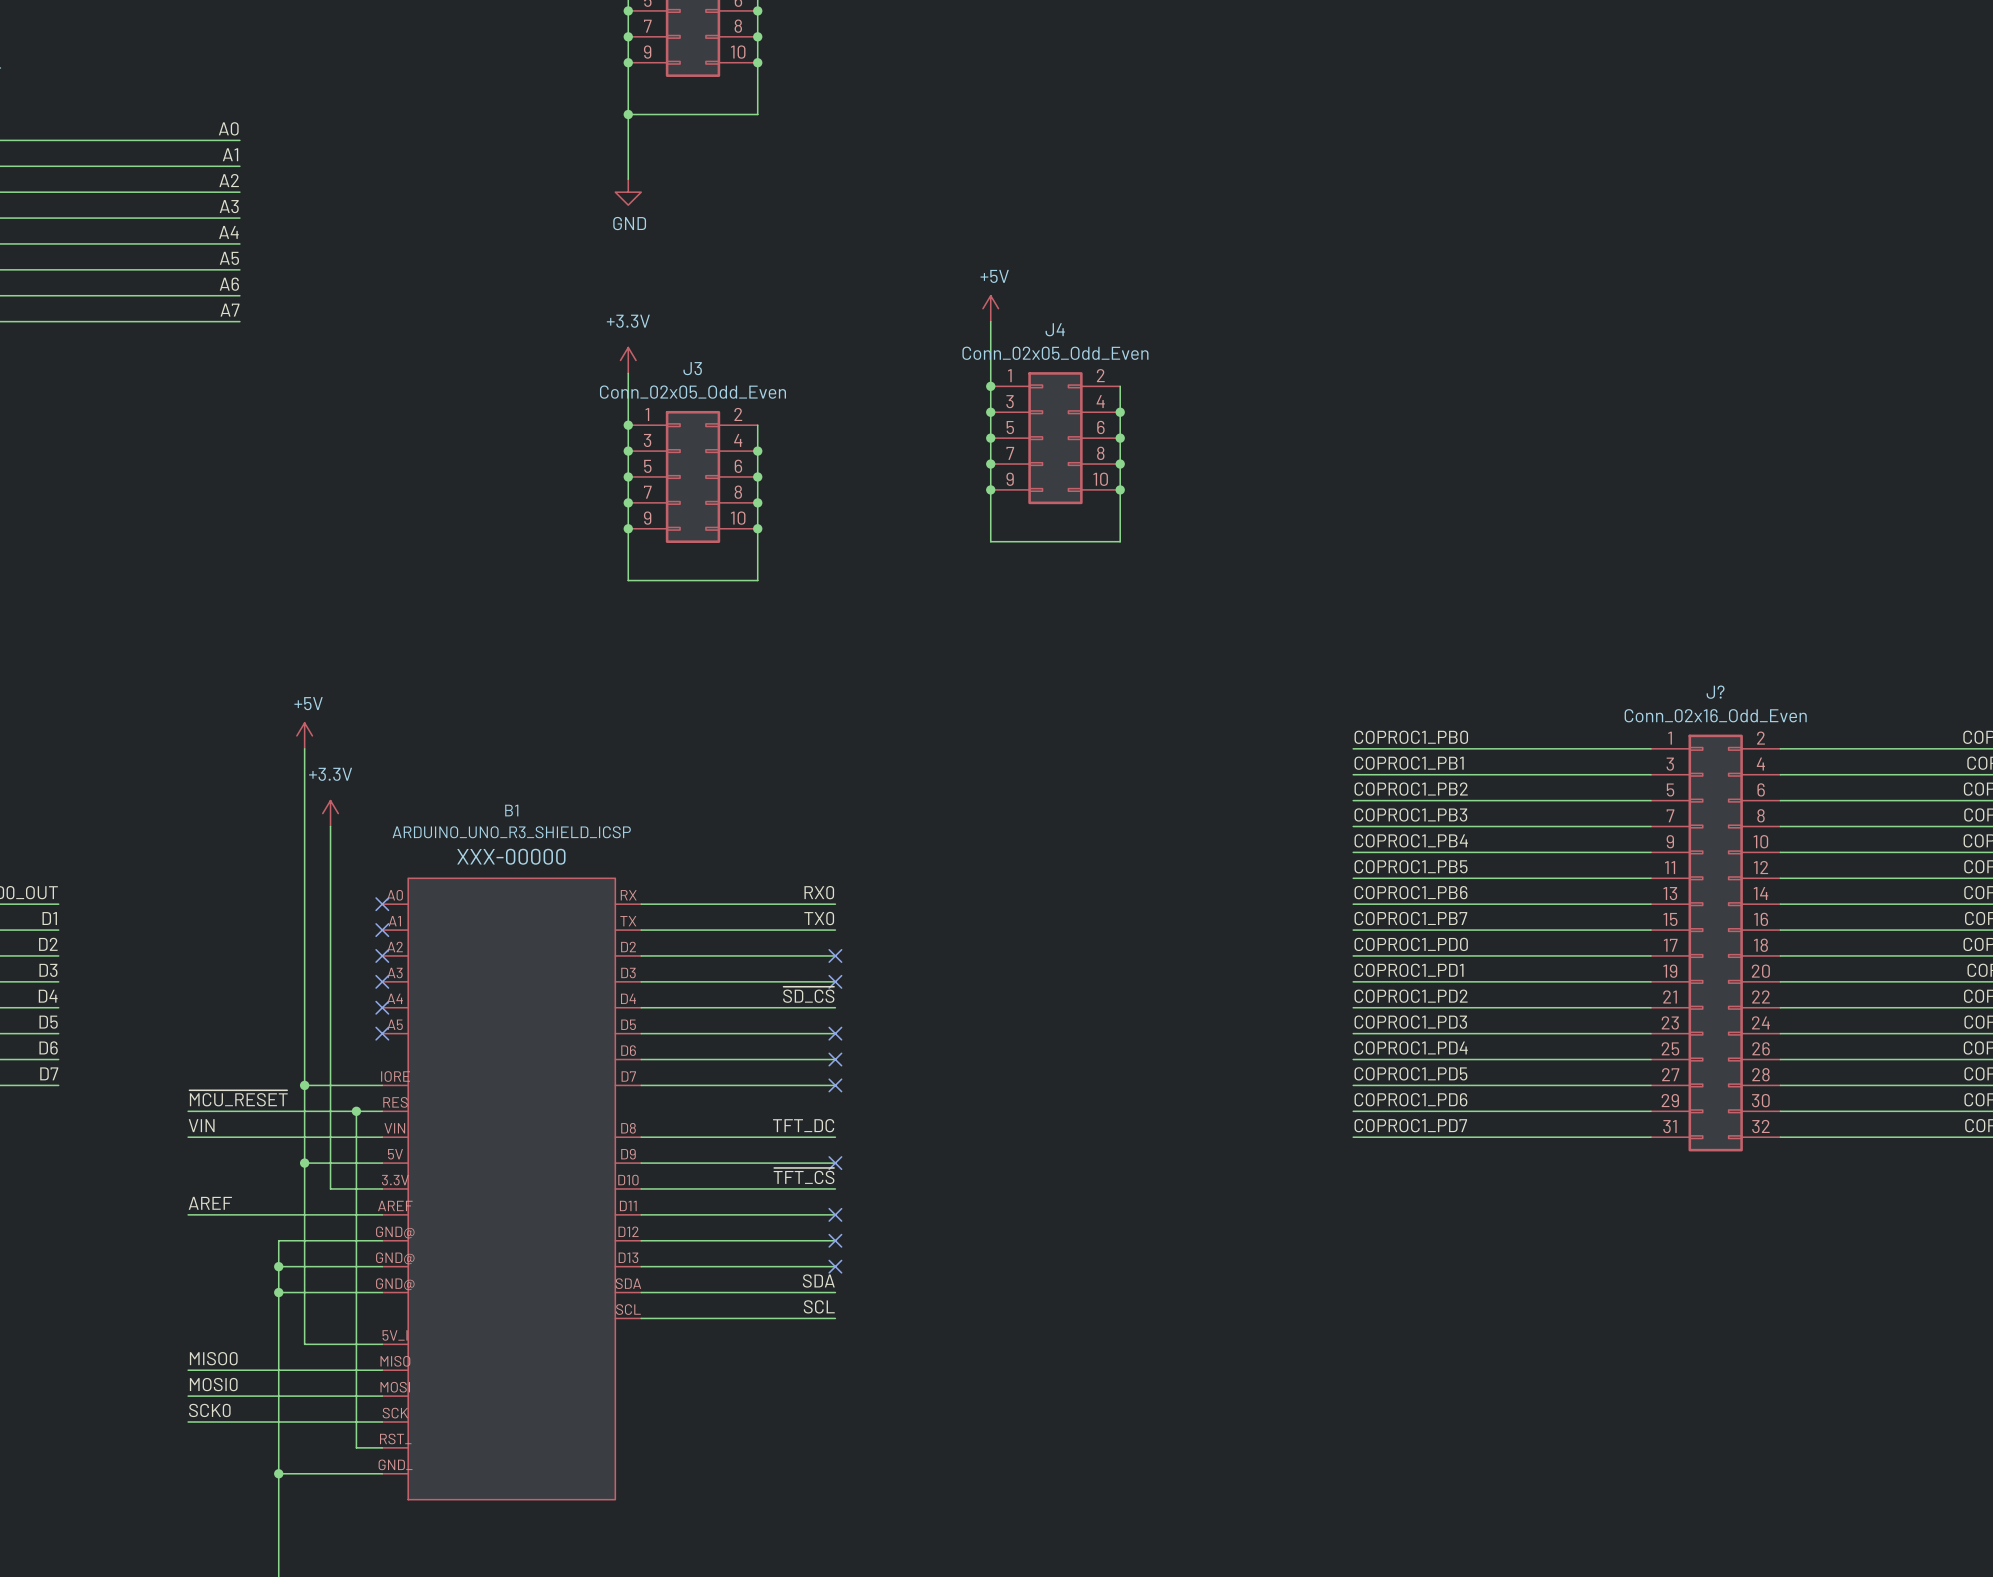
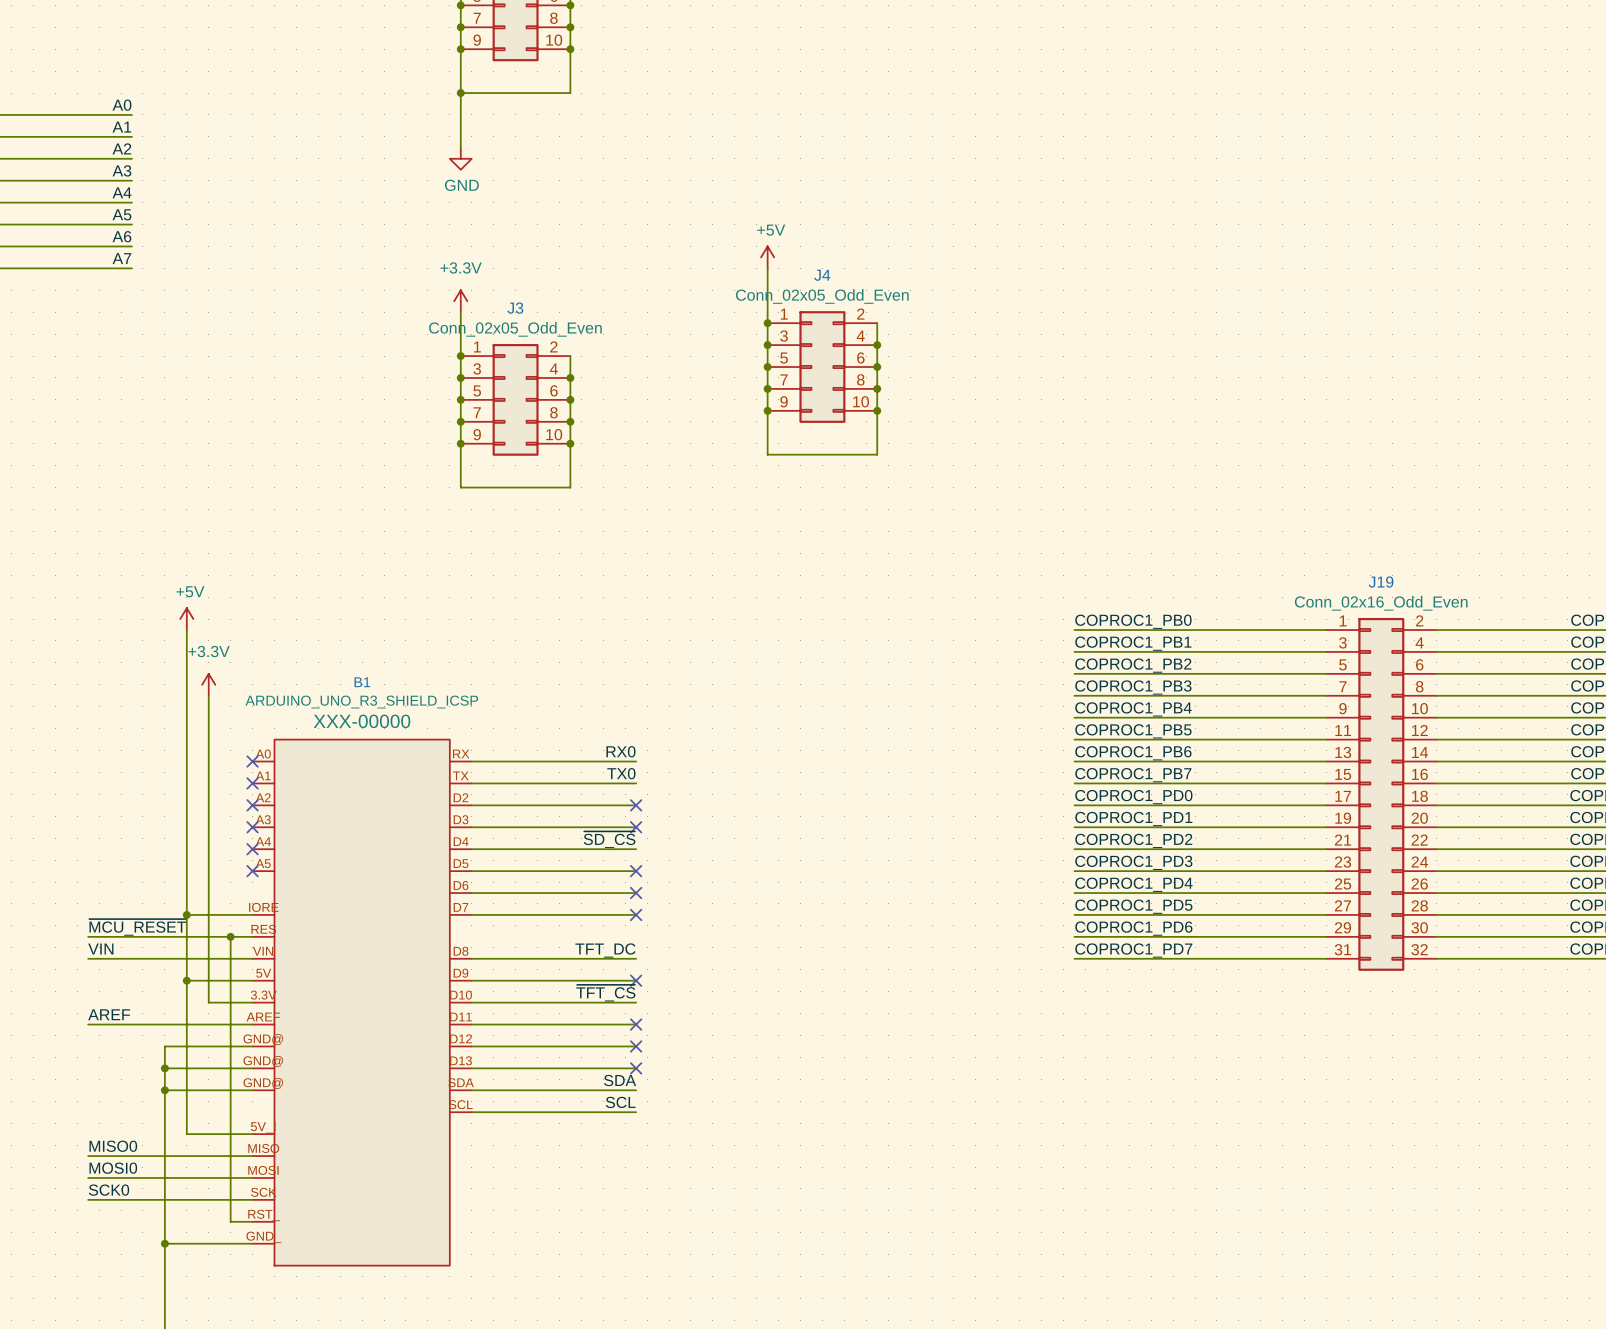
J? name: J? (1715, 692) -> J19 (1381, 582)

